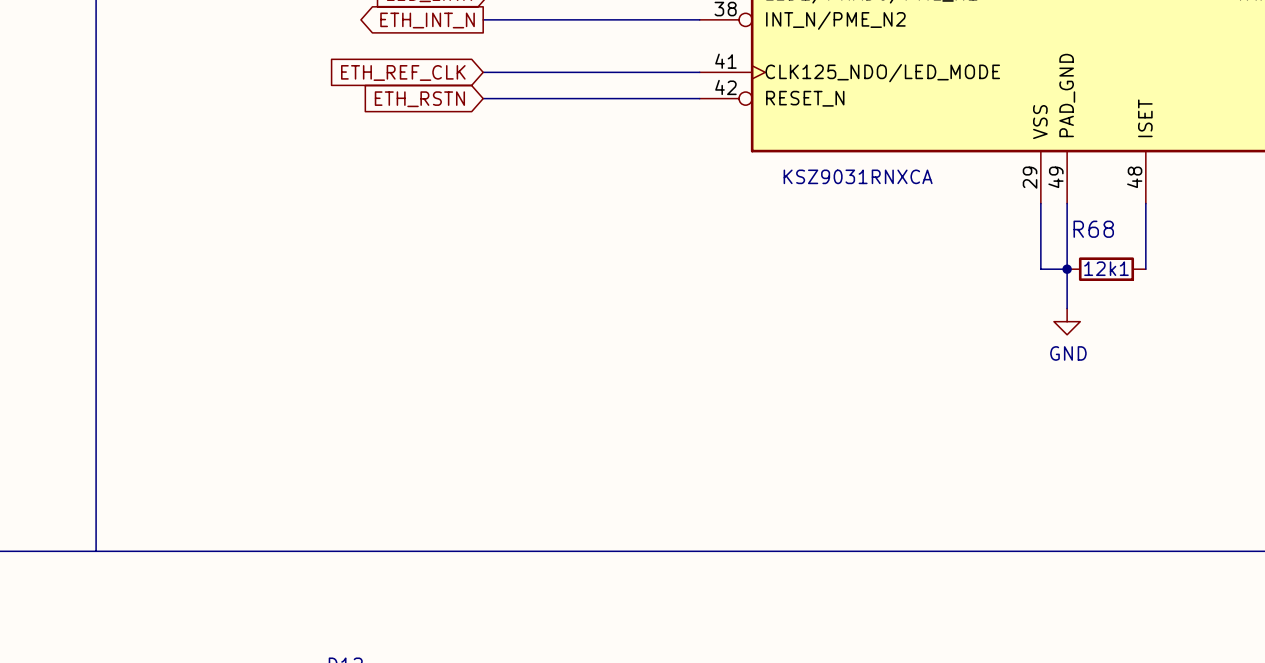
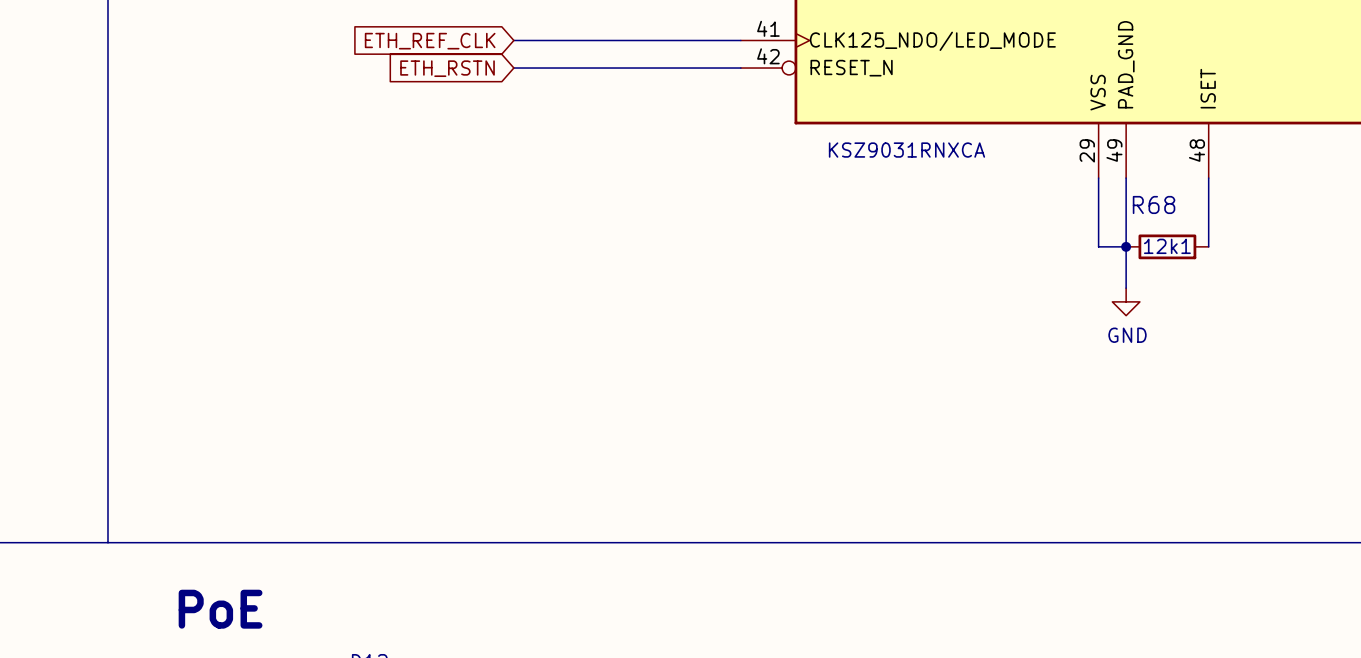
text: none -> PoE (220, 609)

